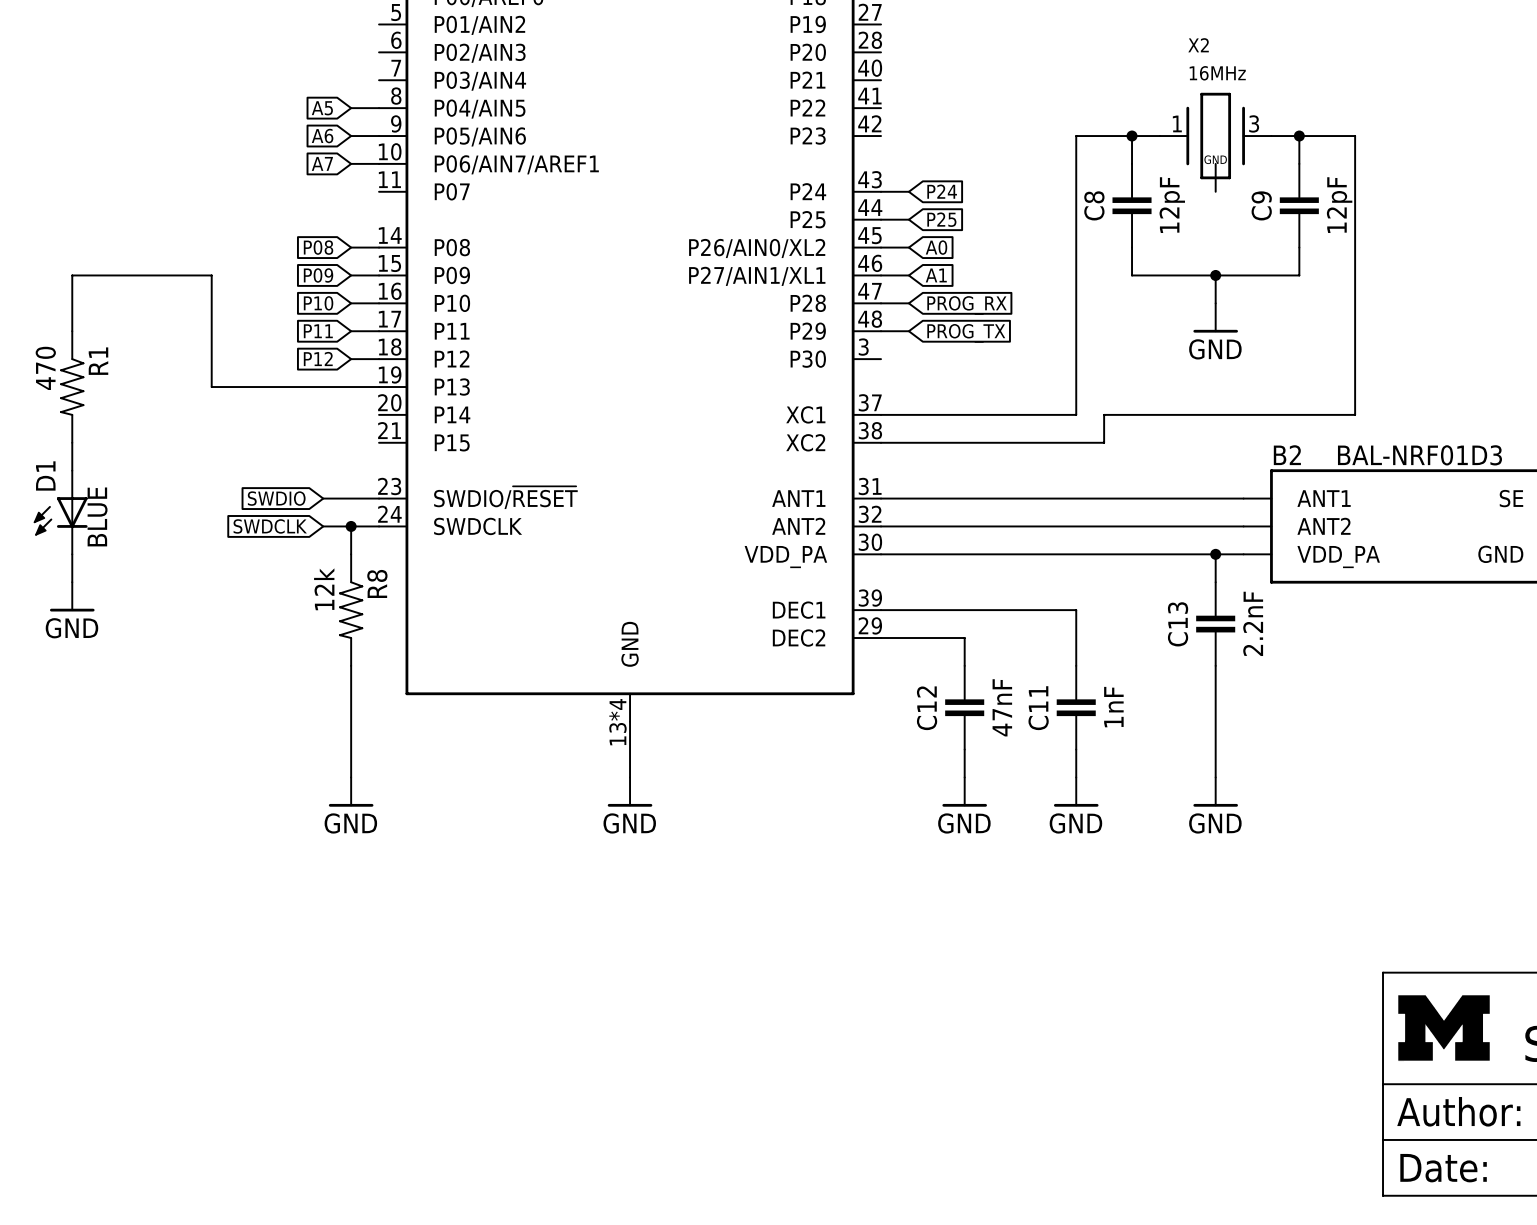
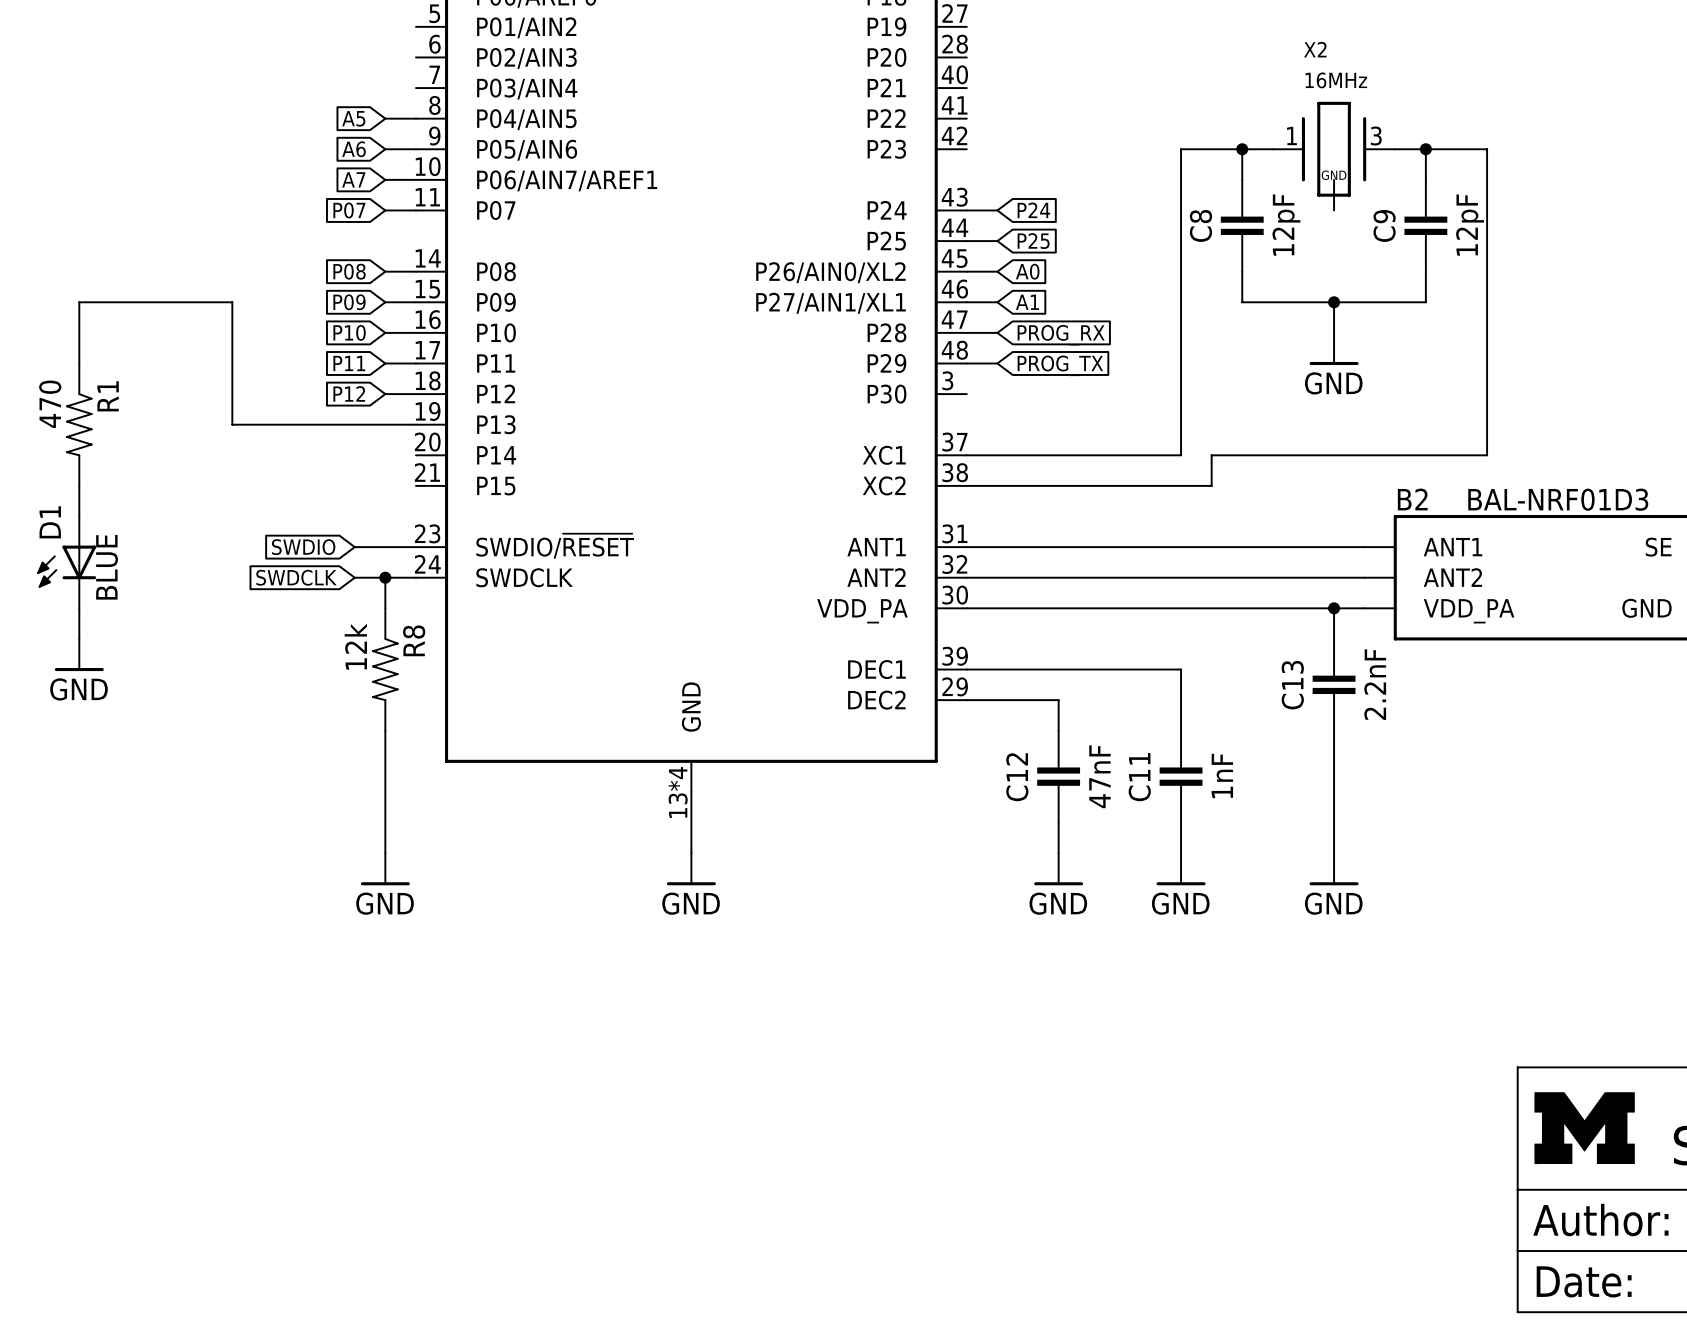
global label: none -> P07 (349, 210)
wire: none -> (385, 210) (415, 210)

